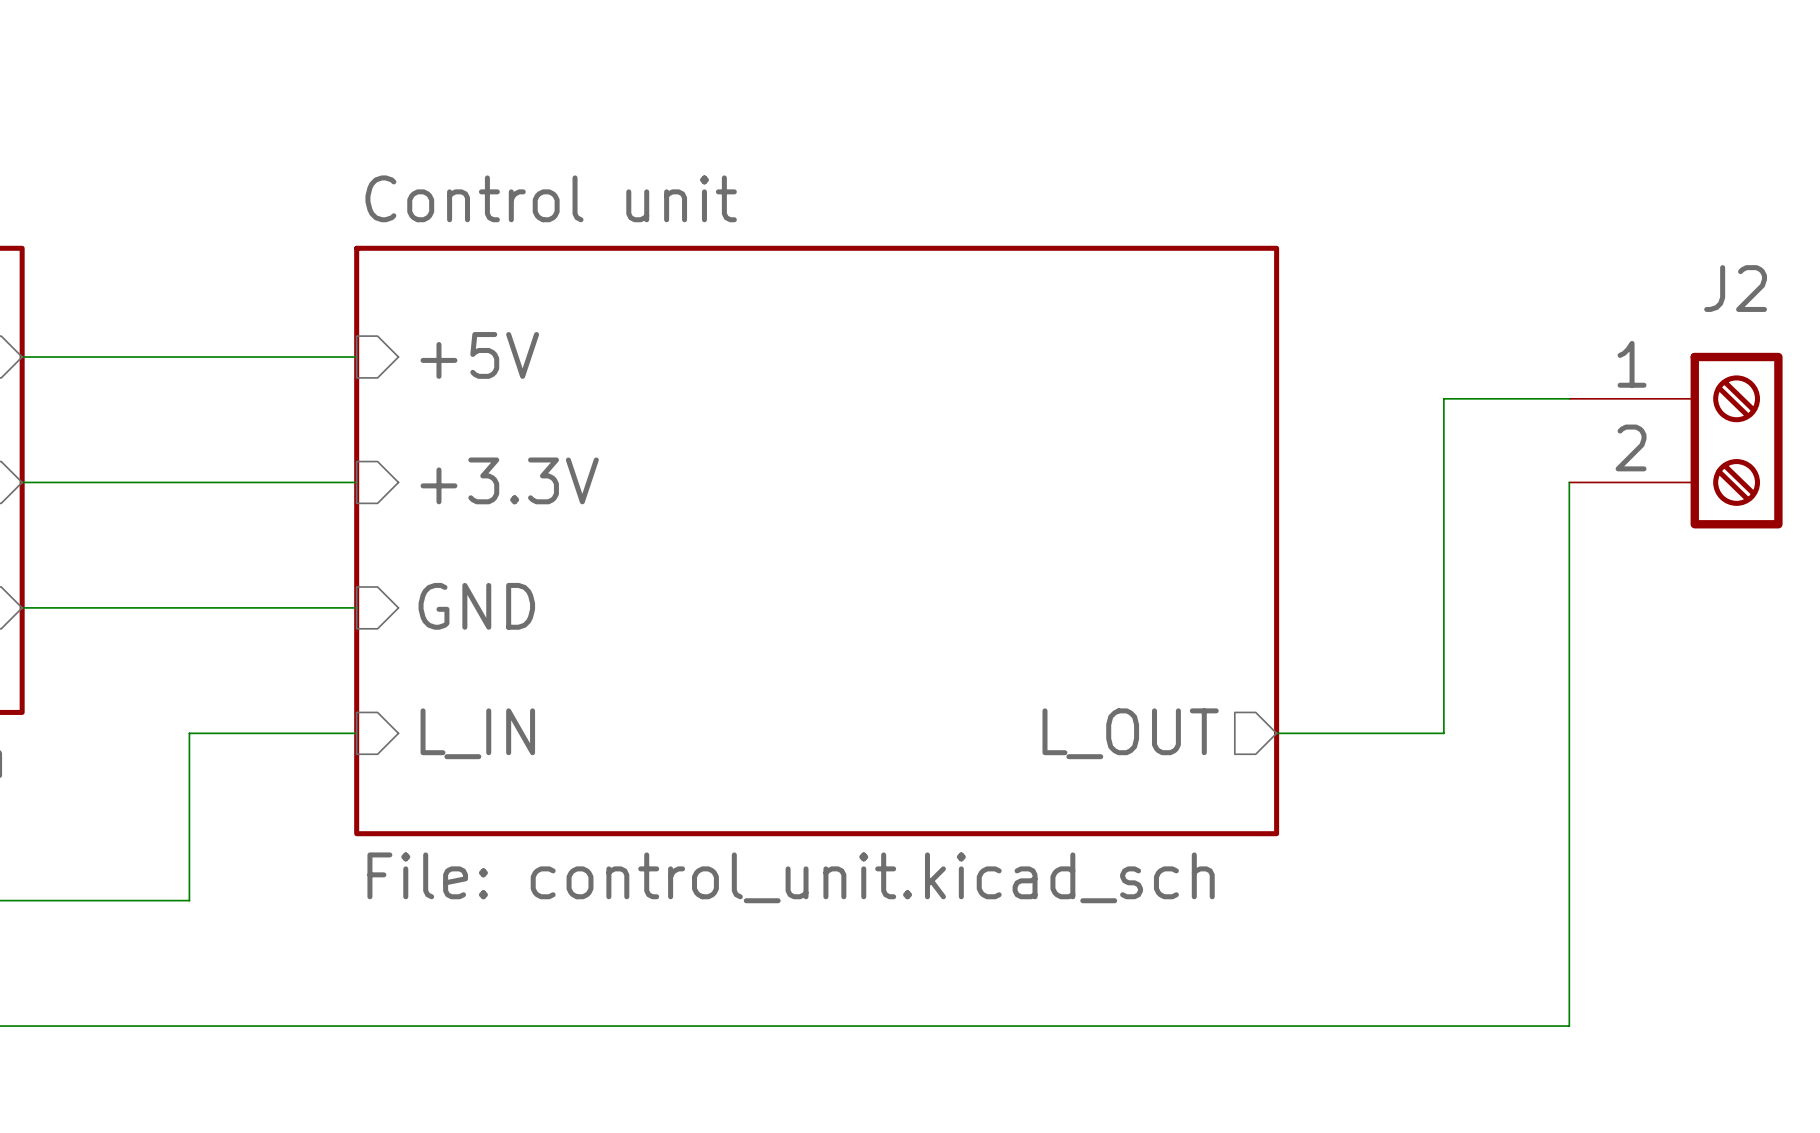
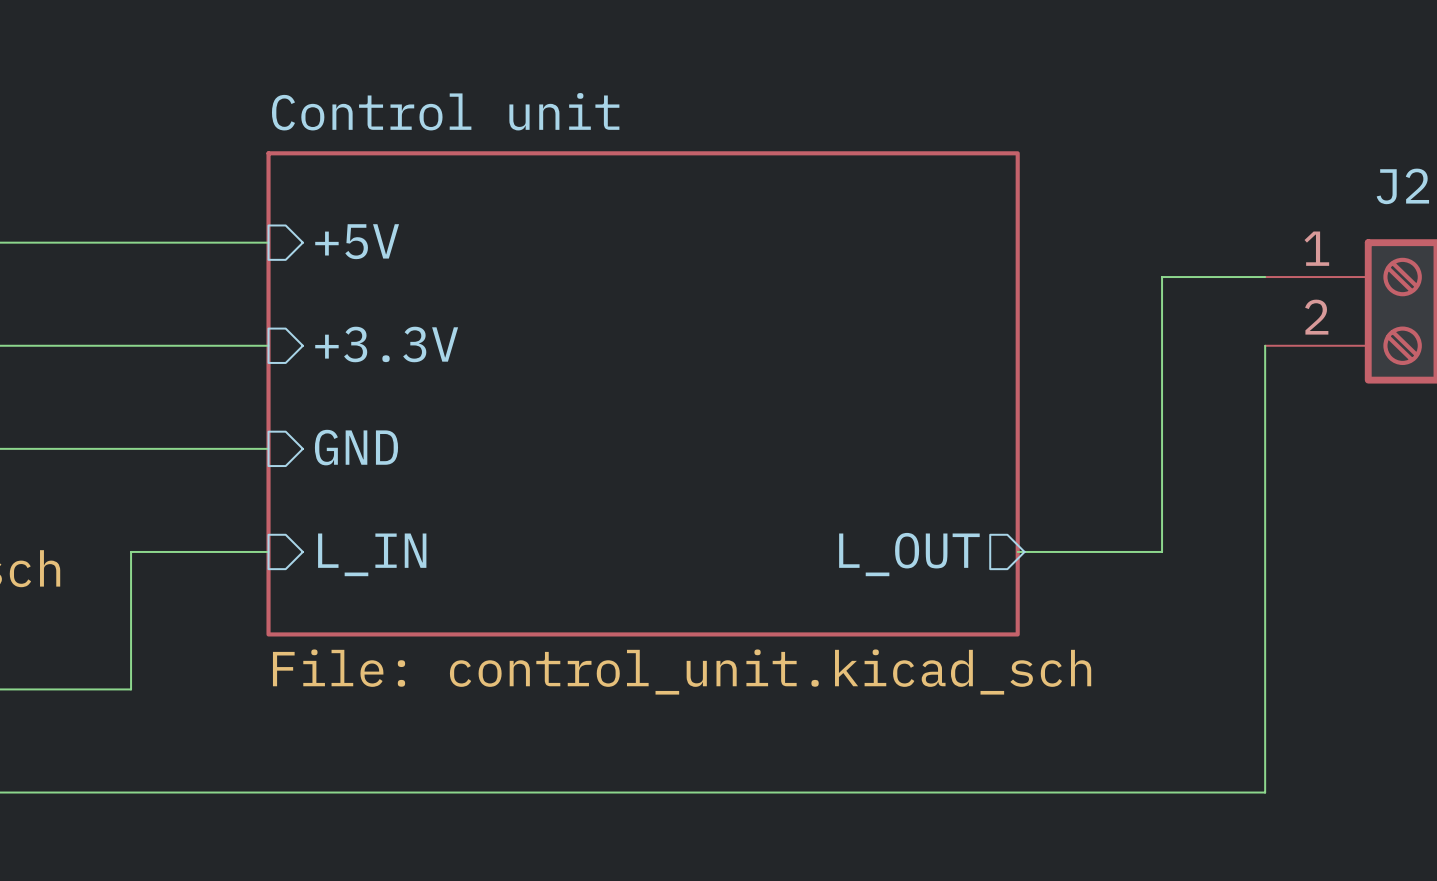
sheet Control unit shape: [354, 245, 1280, 837] -> [266, 151, 1020, 637]
wire: none -> (1017, 551) (1024, 551)

